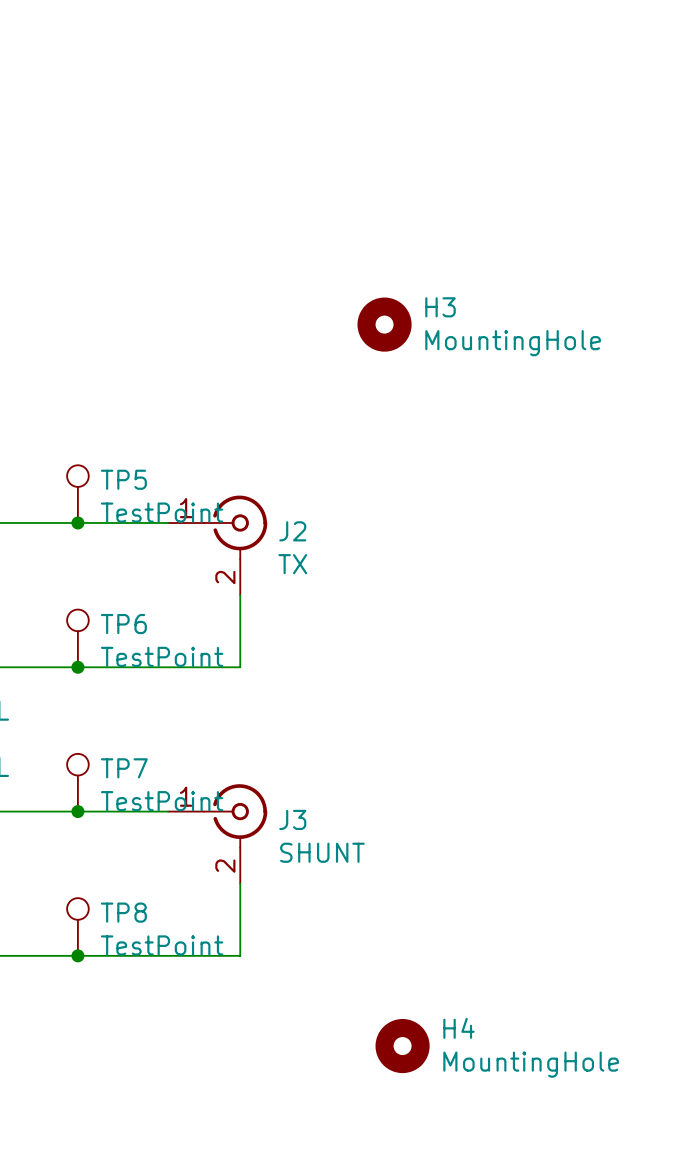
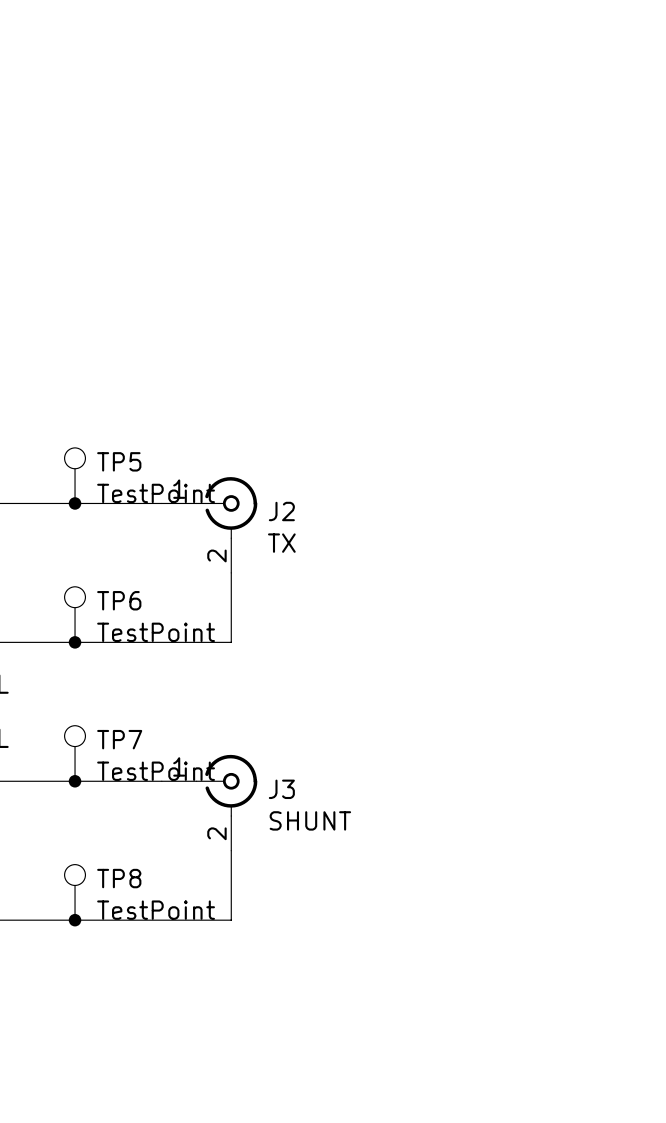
H3: MountingHole (384, 324) -> none
H4: MountingHole (402, 1046) -> none

